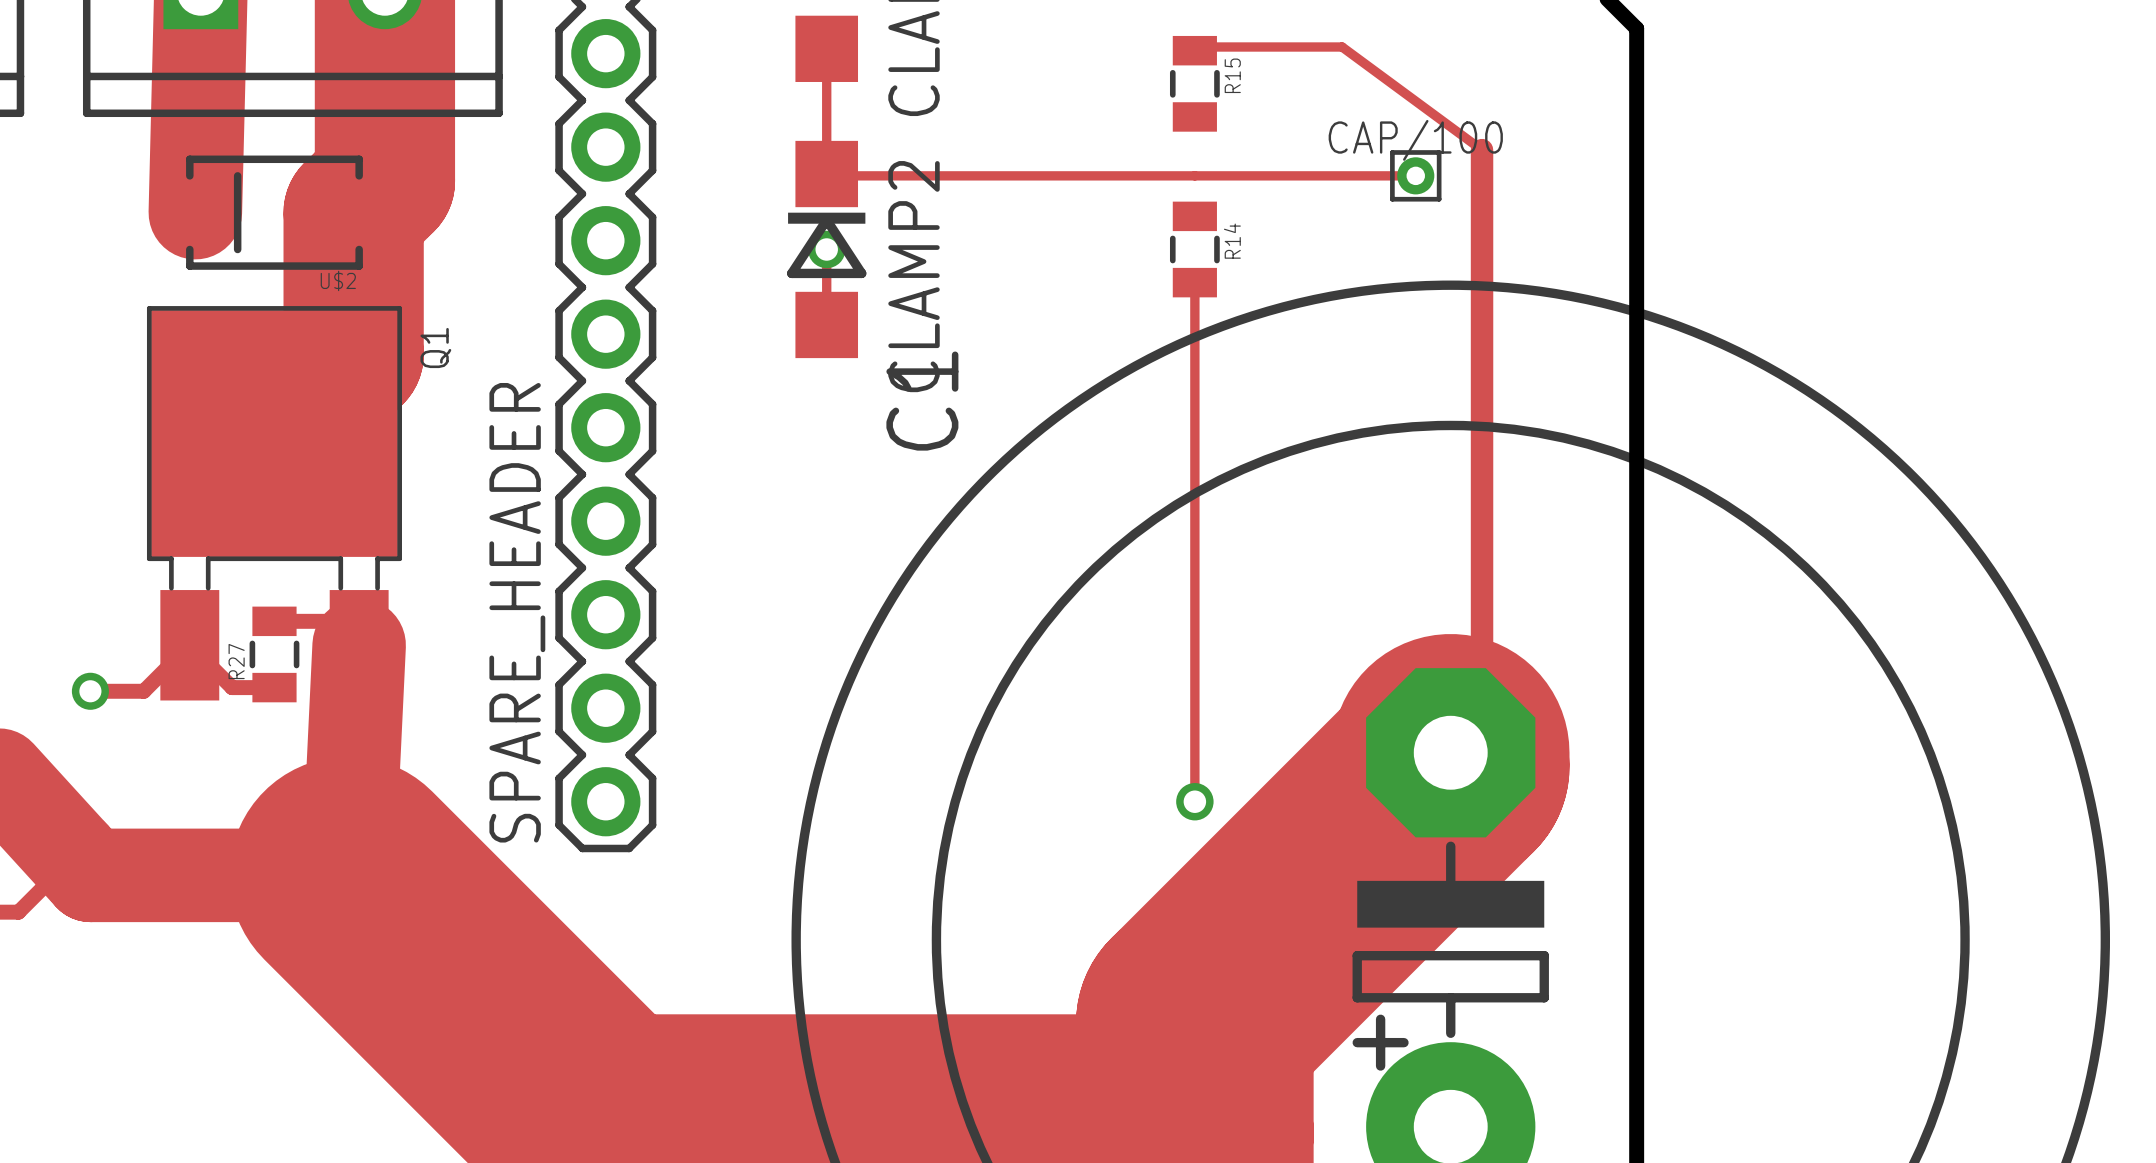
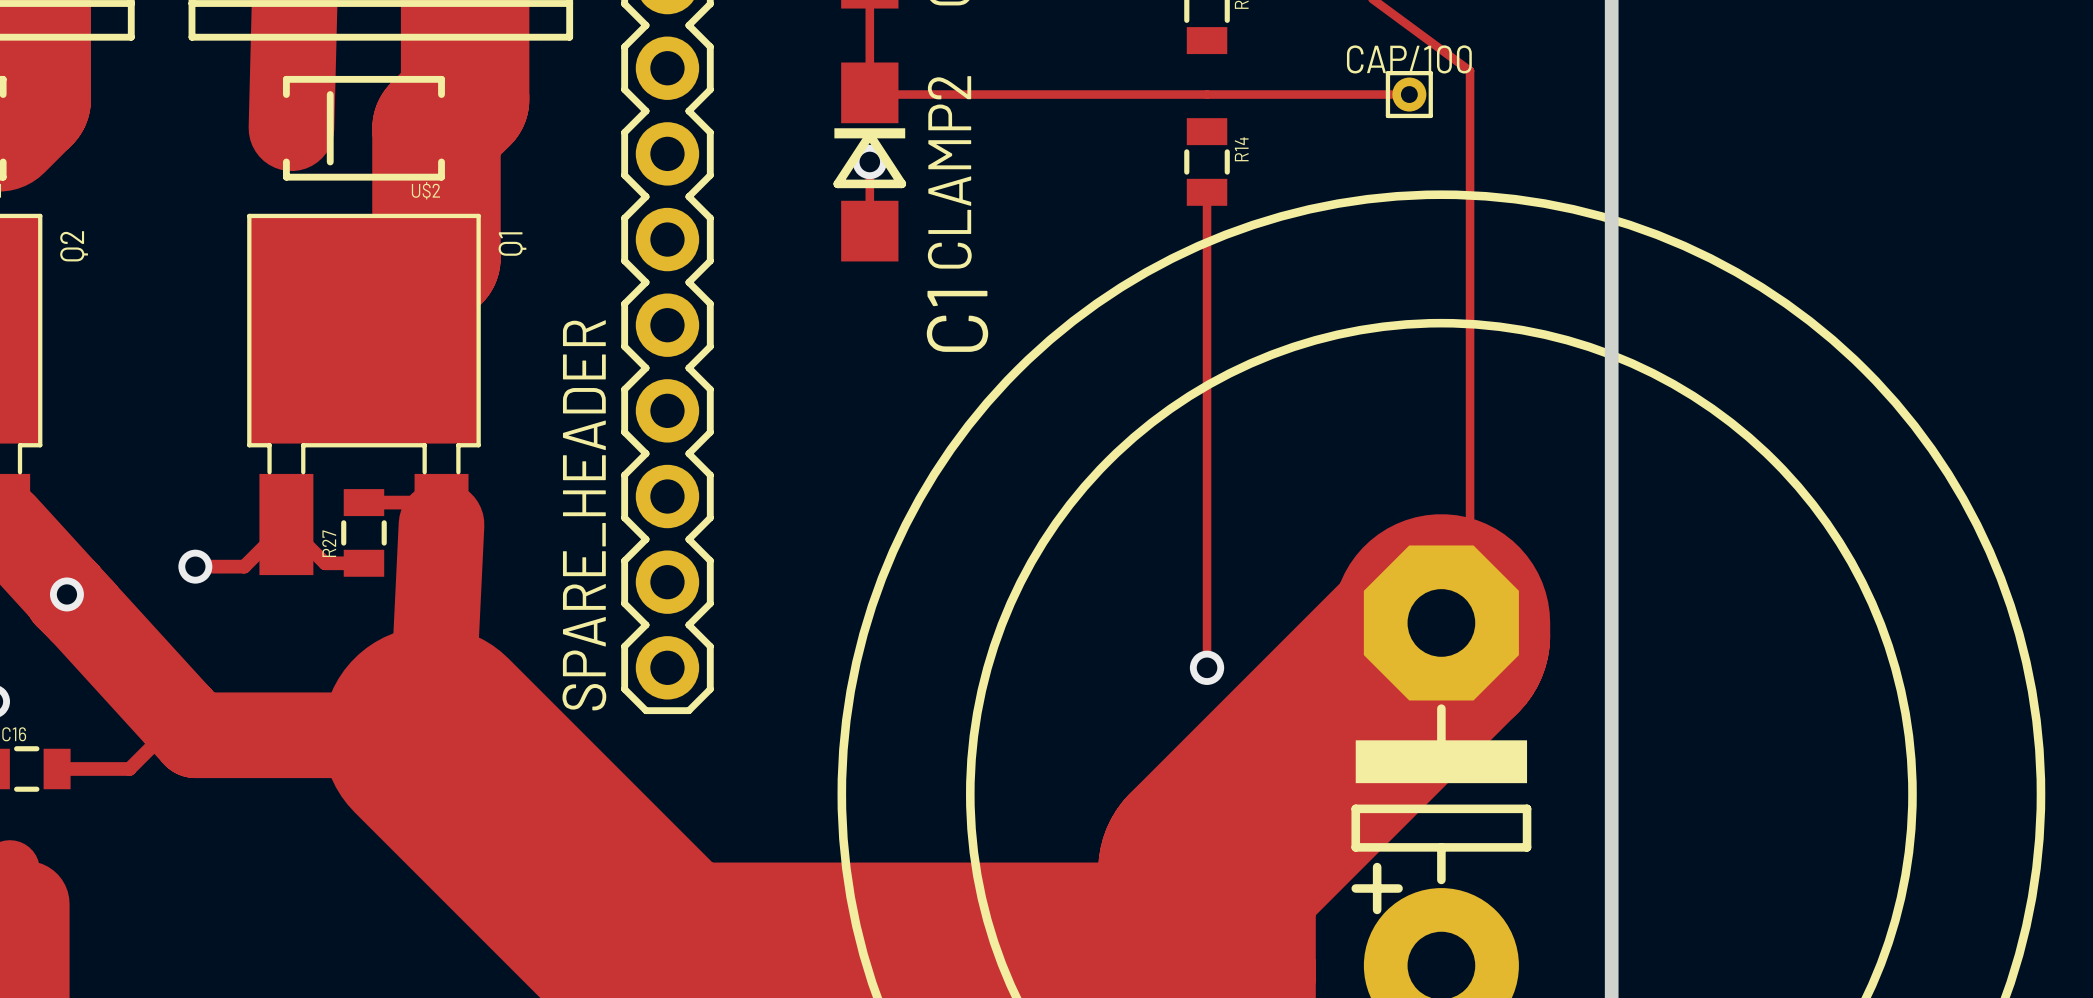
track width: thick (1482, 150) (1482, 650) -> thin (1470, 70) (1470, 529)

